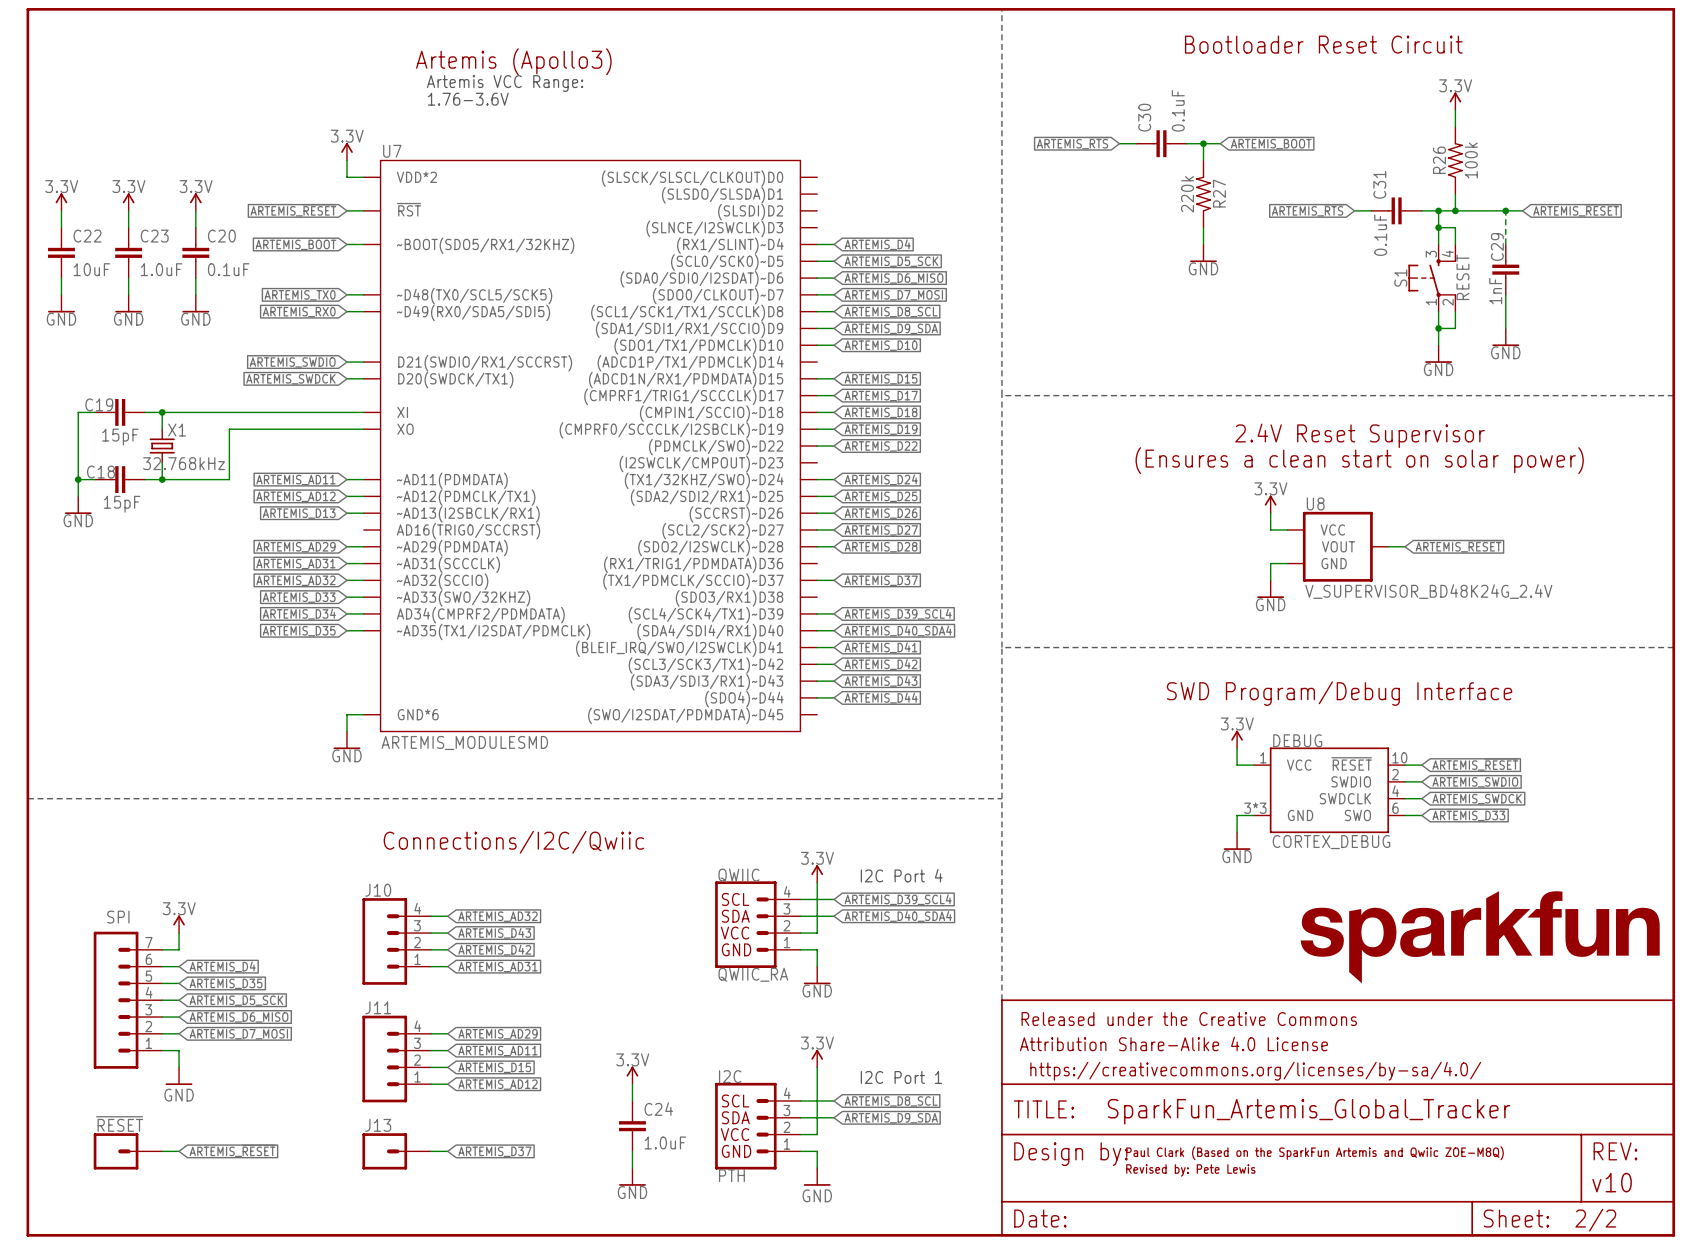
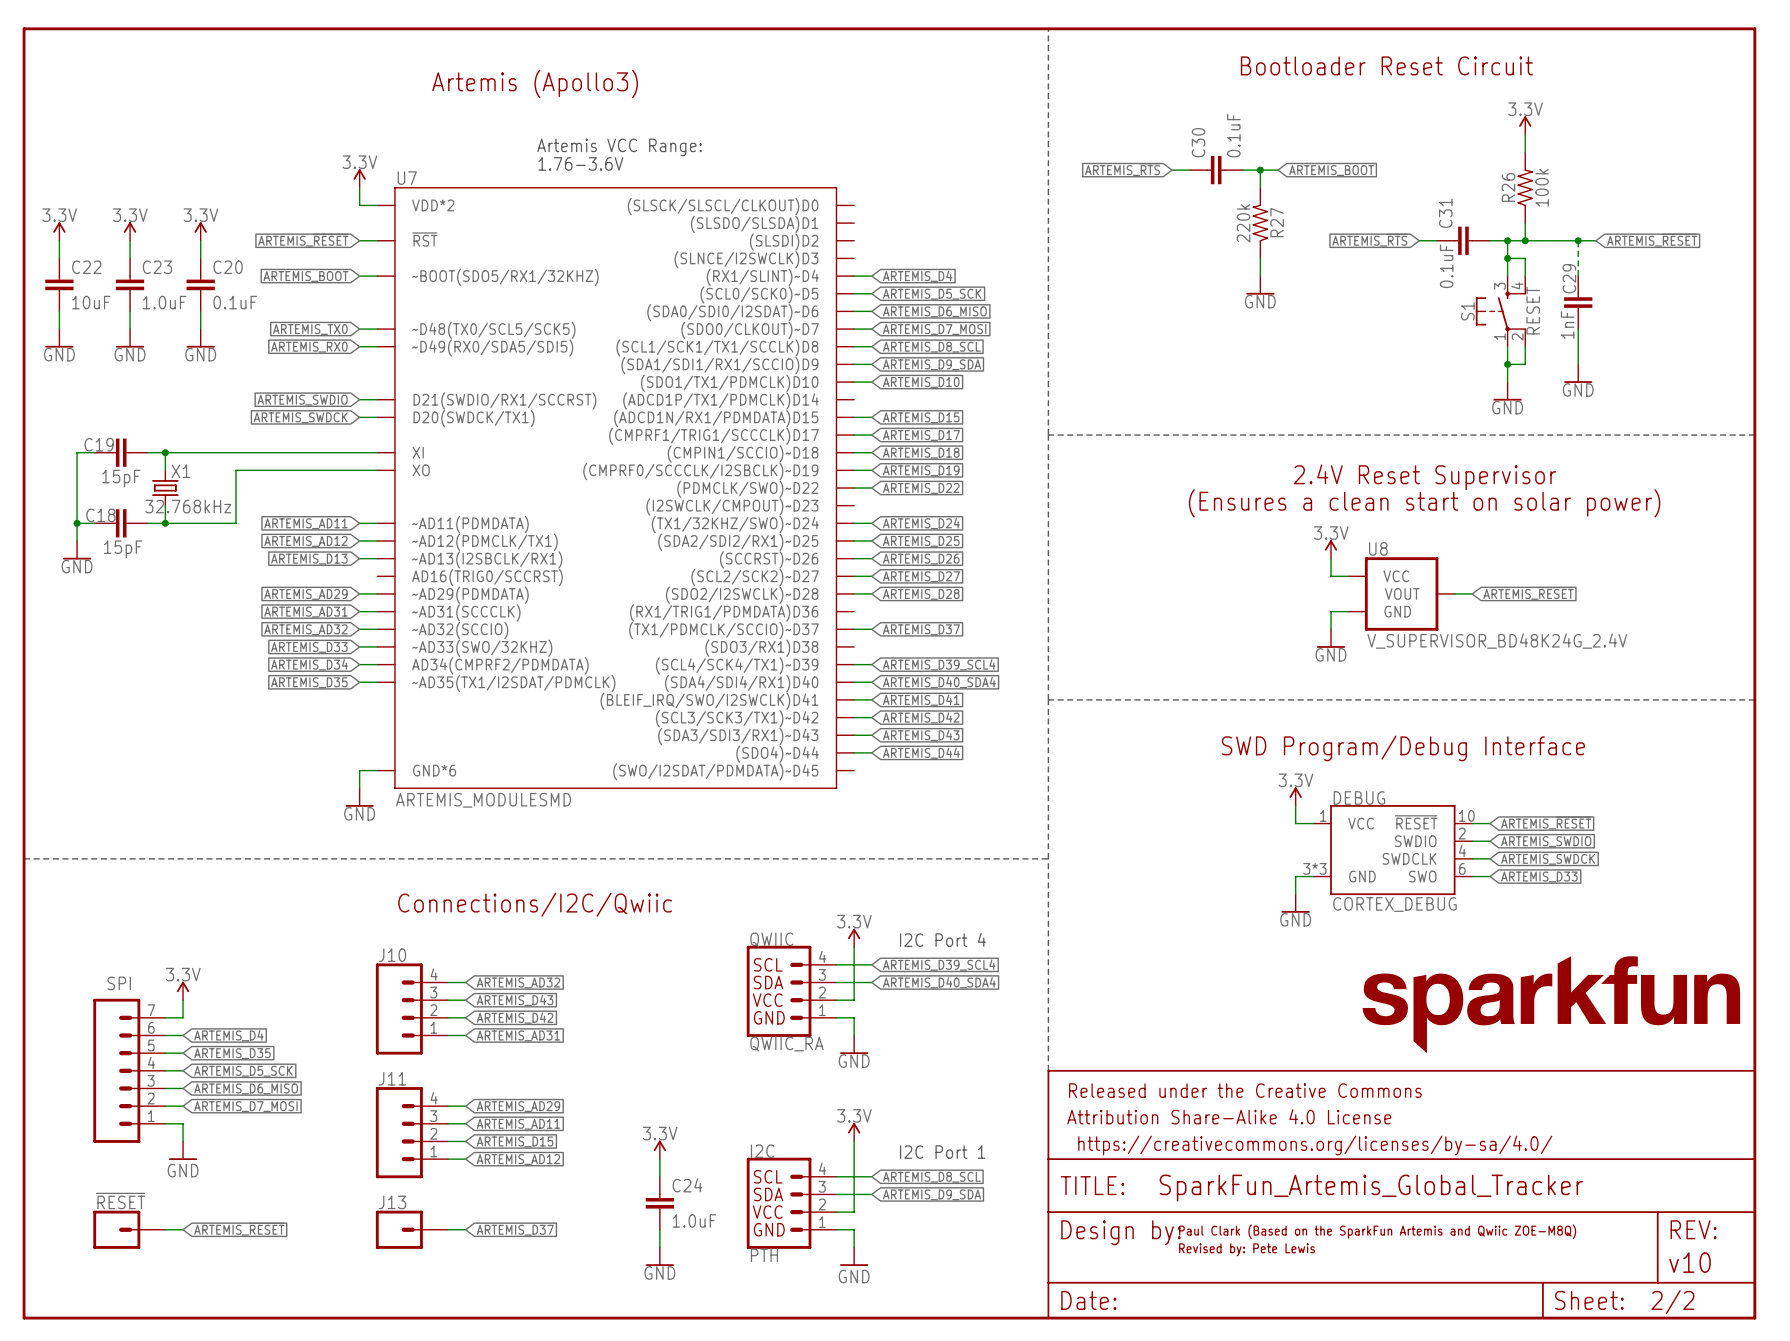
text position: Artemis VCC Range: (505, 83) -> Artemis VCC Range: (619, 147)
text position: 1.76-3.6V (468, 99) -> 1.76-3.6V (580, 163)

